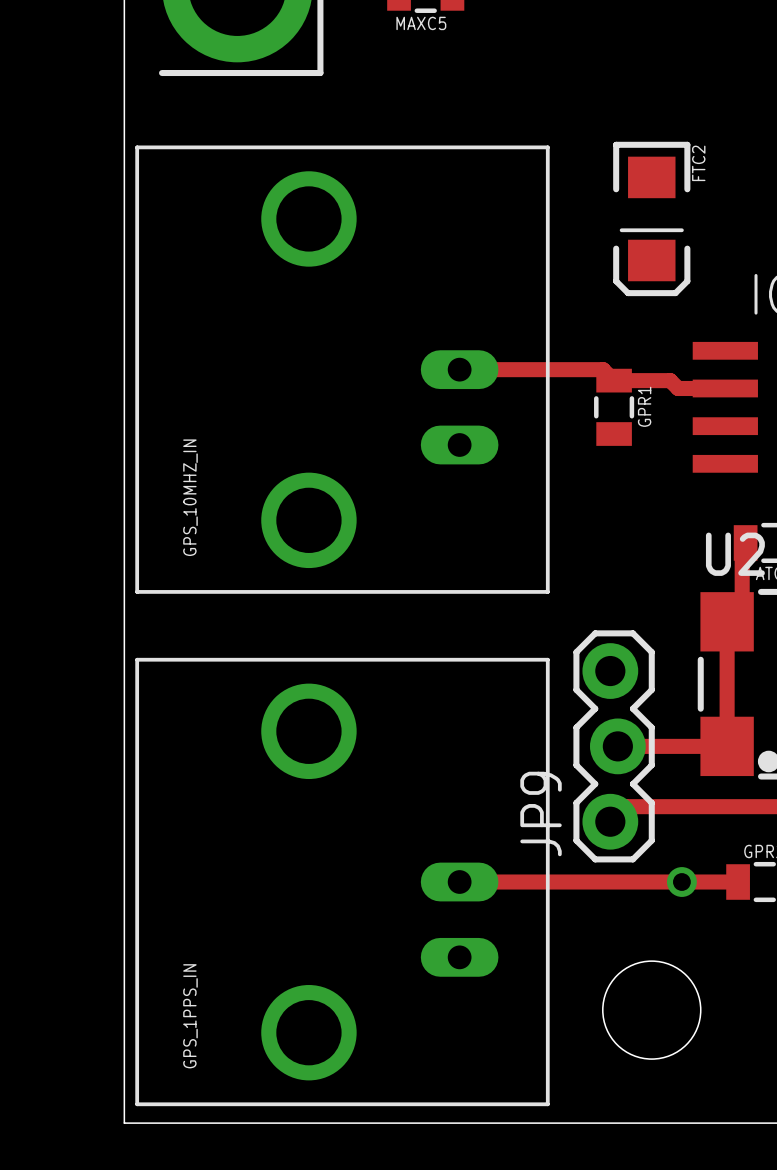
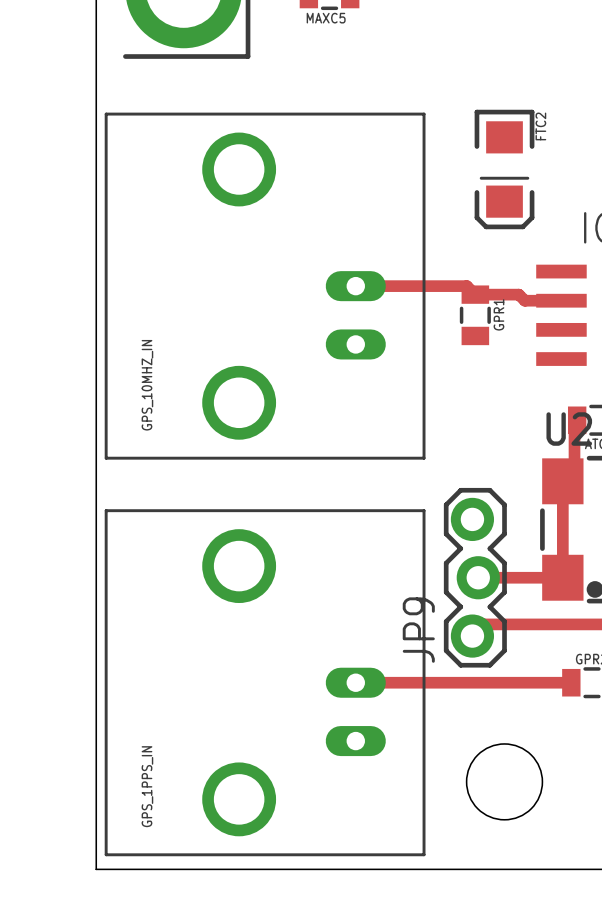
via: (681, 882) -> none

